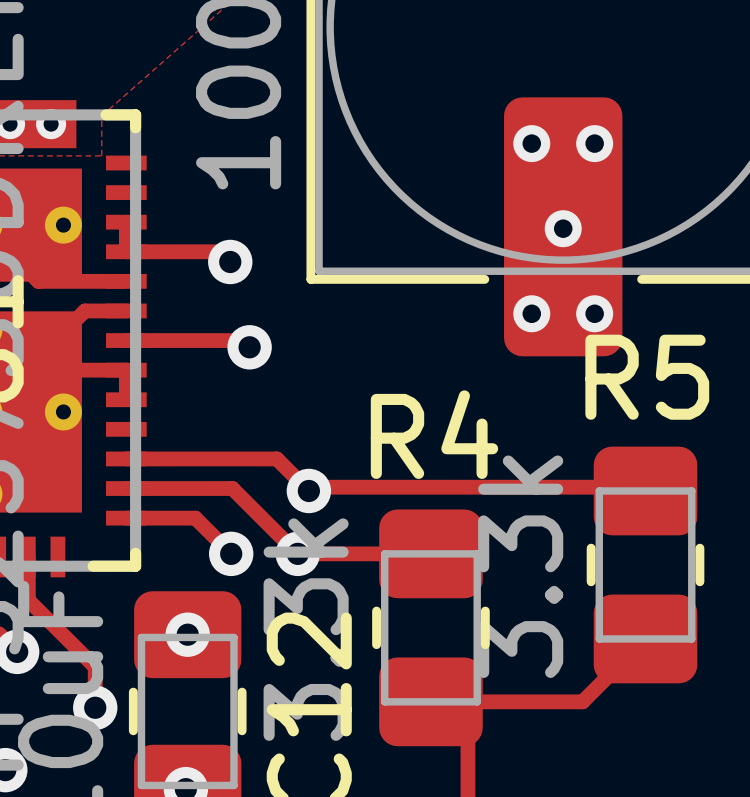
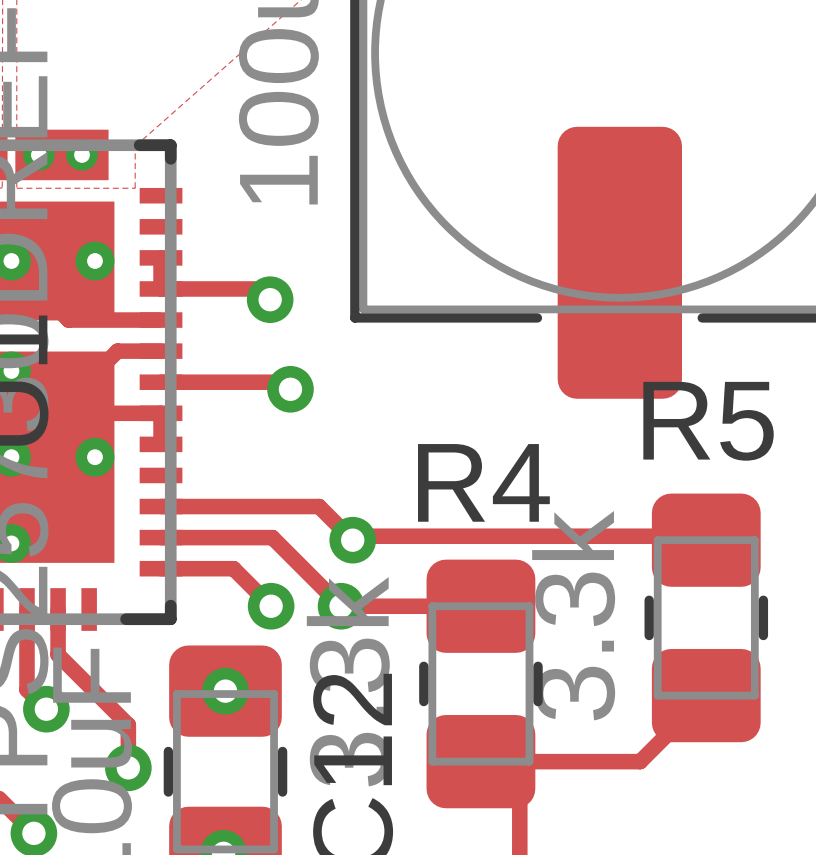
via: (531, 143) -> none
via: (594, 143) -> none
via: (563, 228) -> none
via: (531, 313) -> none
via: (594, 313) -> none

